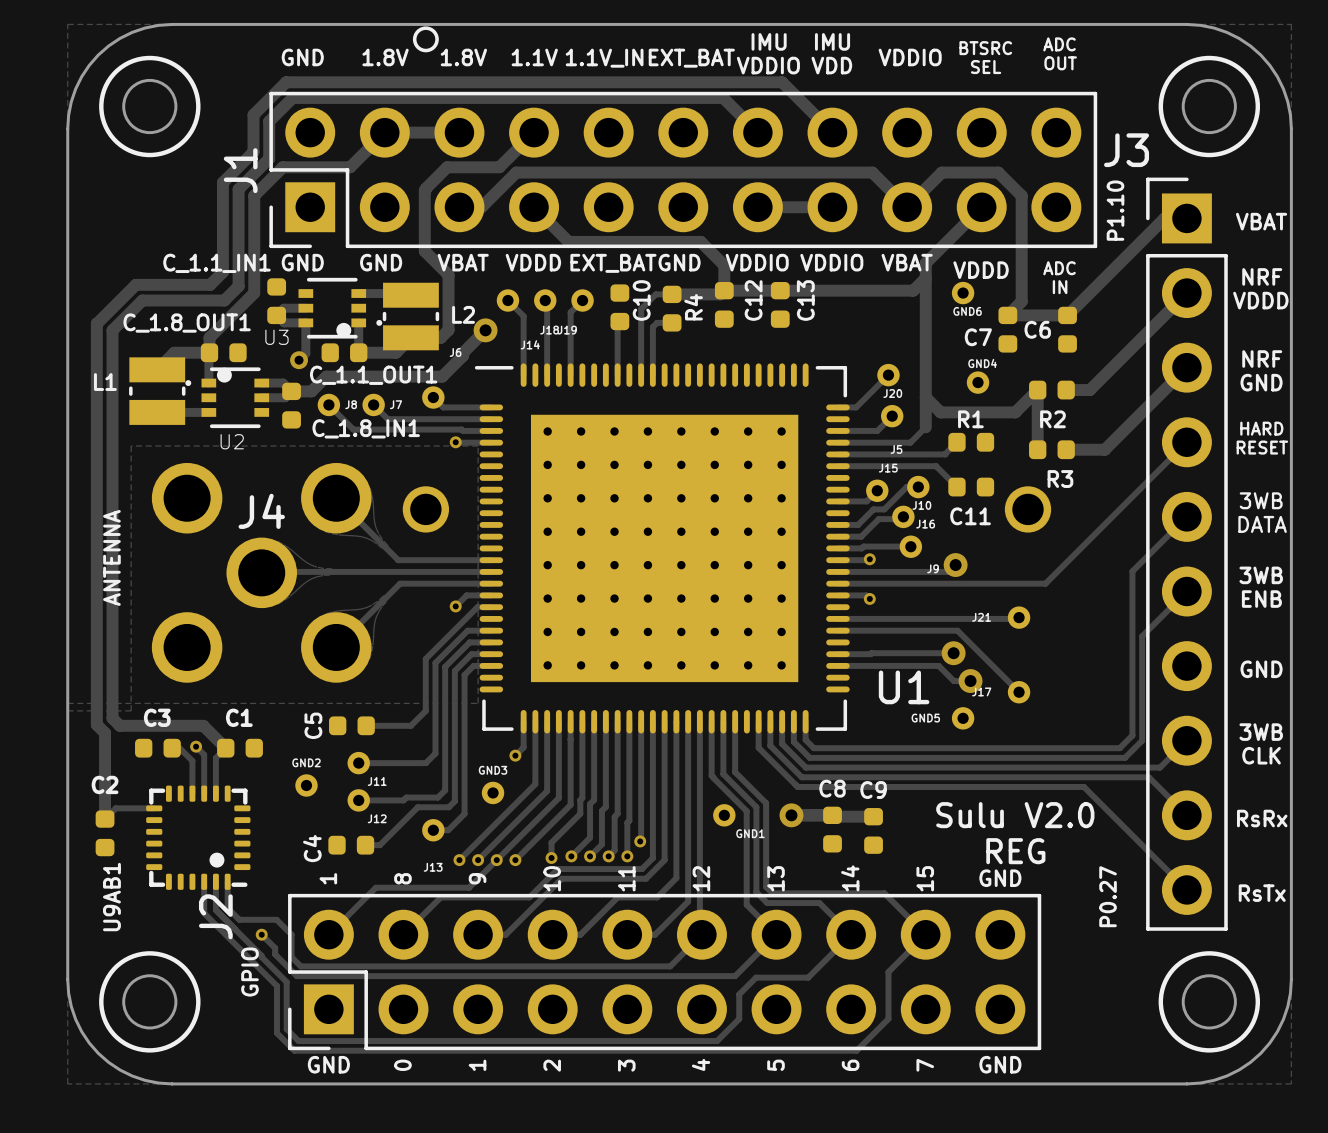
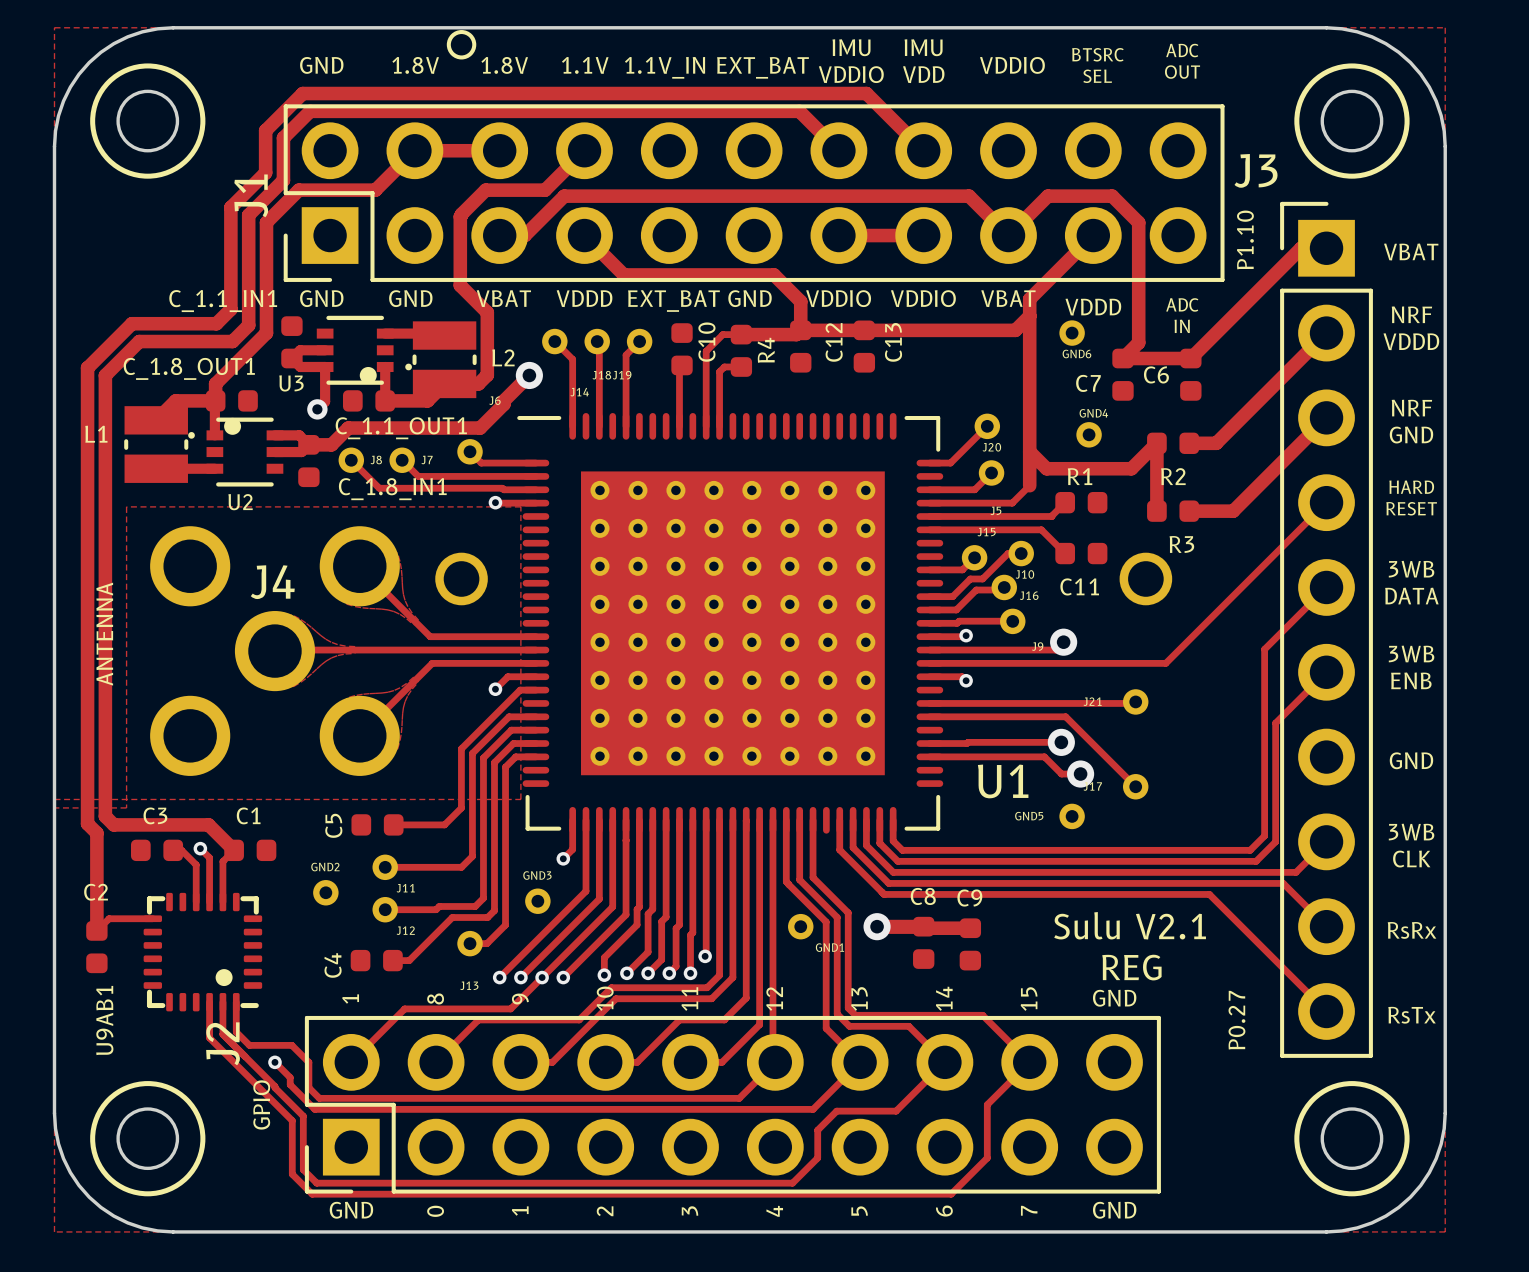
text: Sulu V2.0 (1015, 815) -> Sulu V2.1 (1130, 925)

